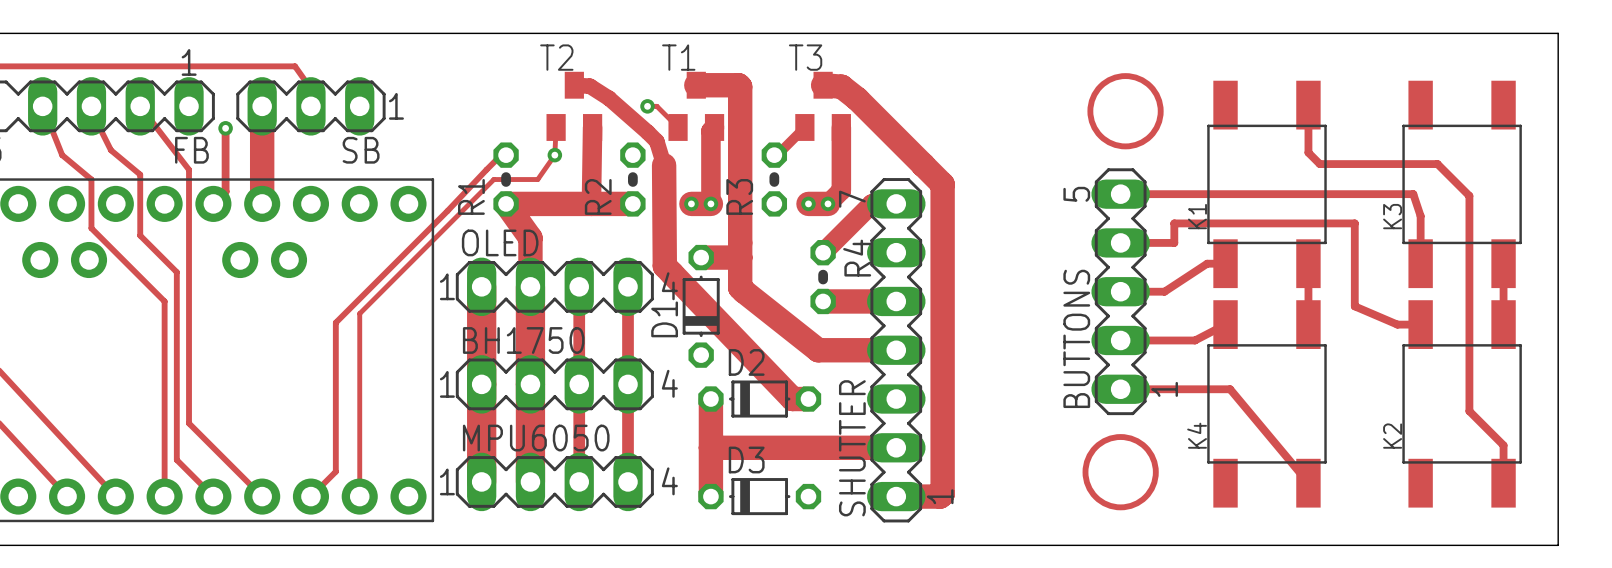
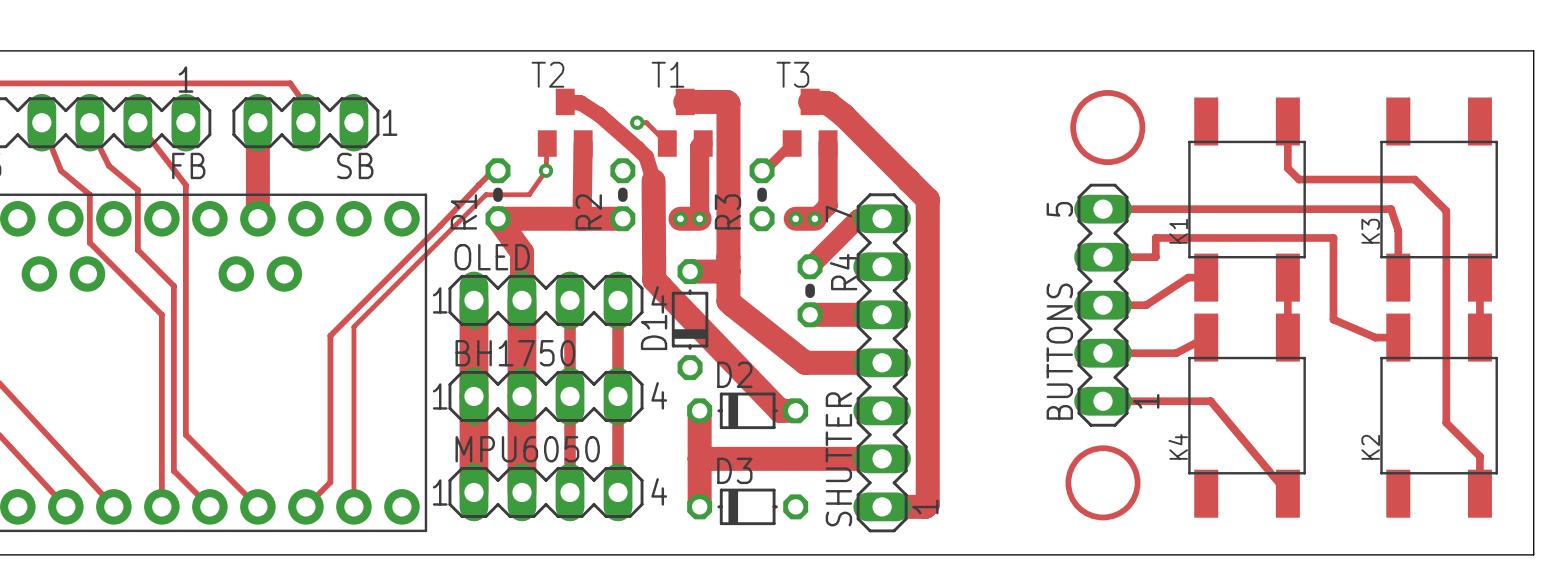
track: (225, 128) (225, 191) (213, 203) -> none
via: (225, 128) -> none

